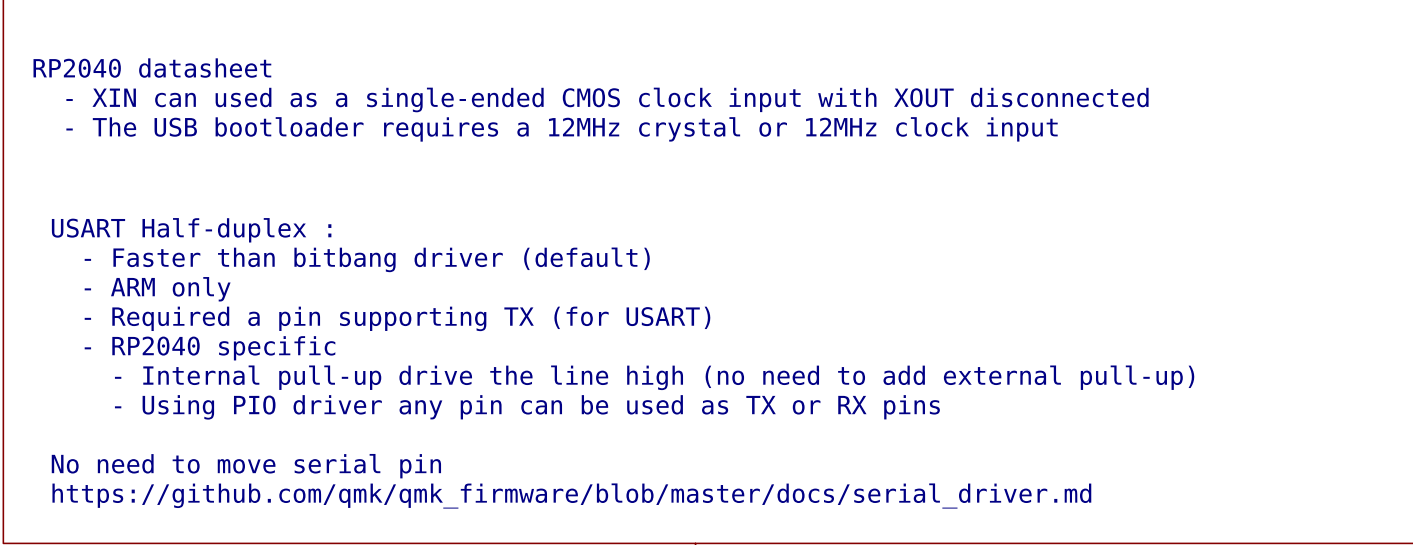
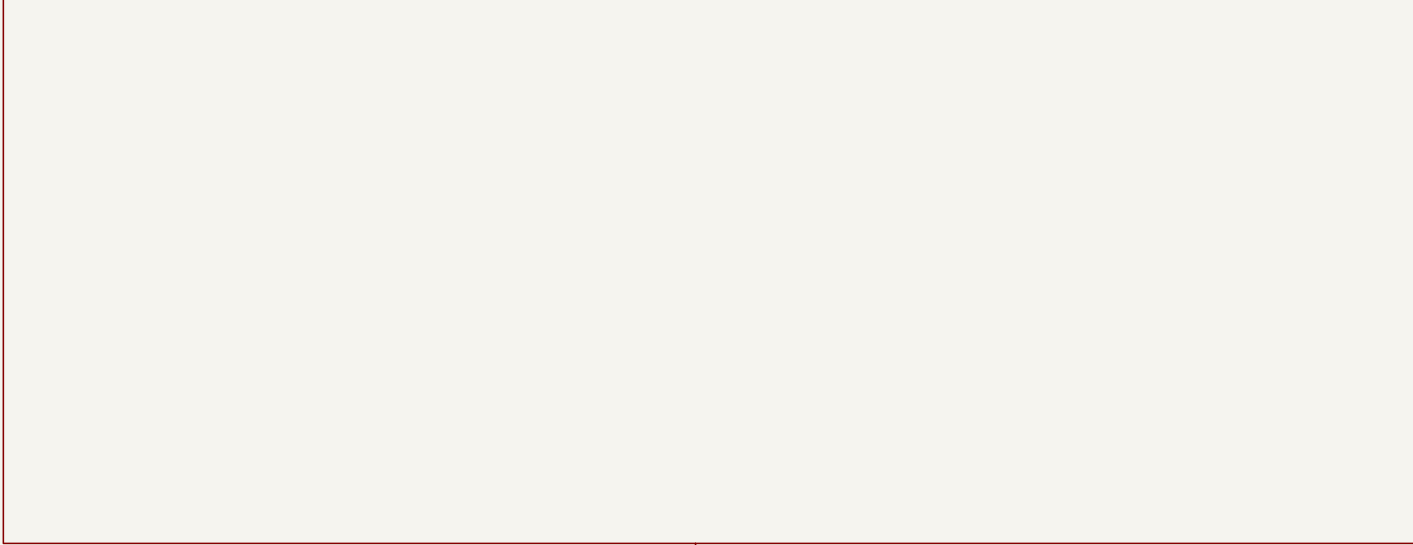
text: RP2040 datasheet (152, 68) -> none
text: - XIN can used as a single-ended CMOS clock input with XOUT disconnected (607, 99) -> none
text: - The USB bootloader requires a 12MHz crystal or 12MHz clock input (562, 129) -> none
text: USART Half-duplex : (191, 230) -> none
text: - Faster than bitbang driver (default) (367, 259) -> none
text: - ARM only (157, 289) -> none
text: - Required a pin supporting TX (for USART) (397, 318) -> none
text: - RP2040 specific (210, 348) -> none
text: - Internal pull-up drive the line high (no need to add external pull-up) (654, 377) -> none
text: - Using PIO driver any pin can be used as TX or RX pins (527, 407) -> none
text: No need to move serial pin (246, 466) -> none
text: https://github.com/qmk/qmk_firmware/blob/master/docs/serial_driver.md (571, 496) -> none

